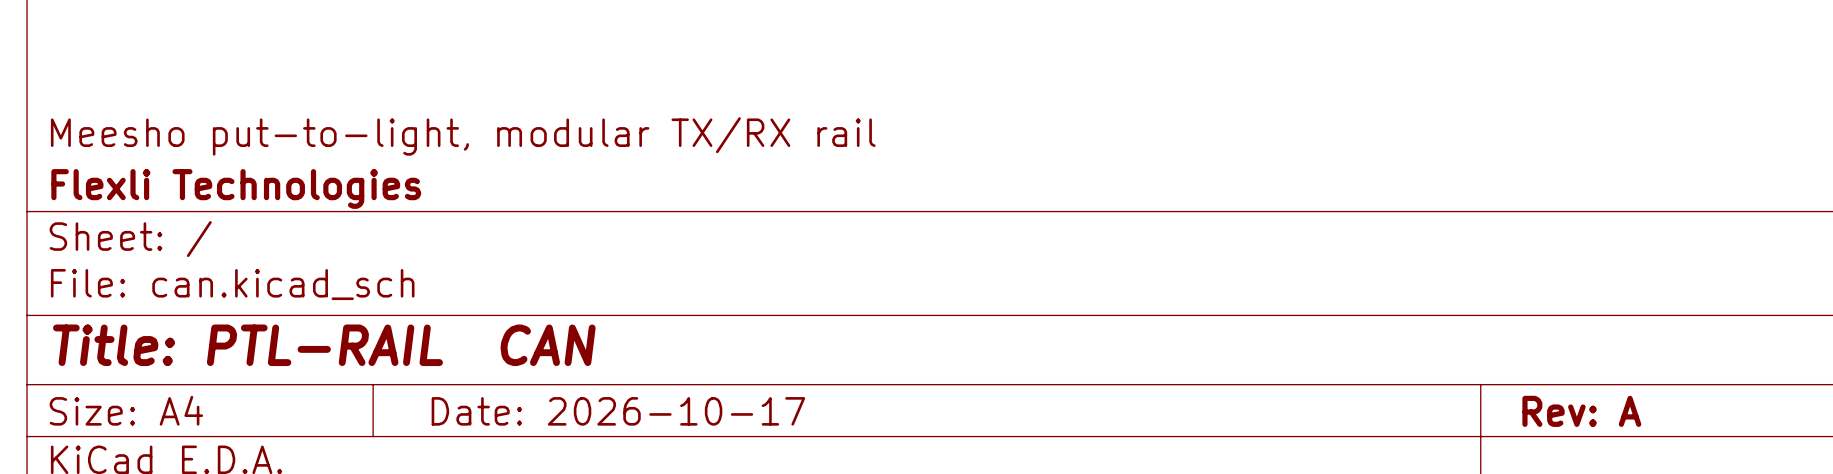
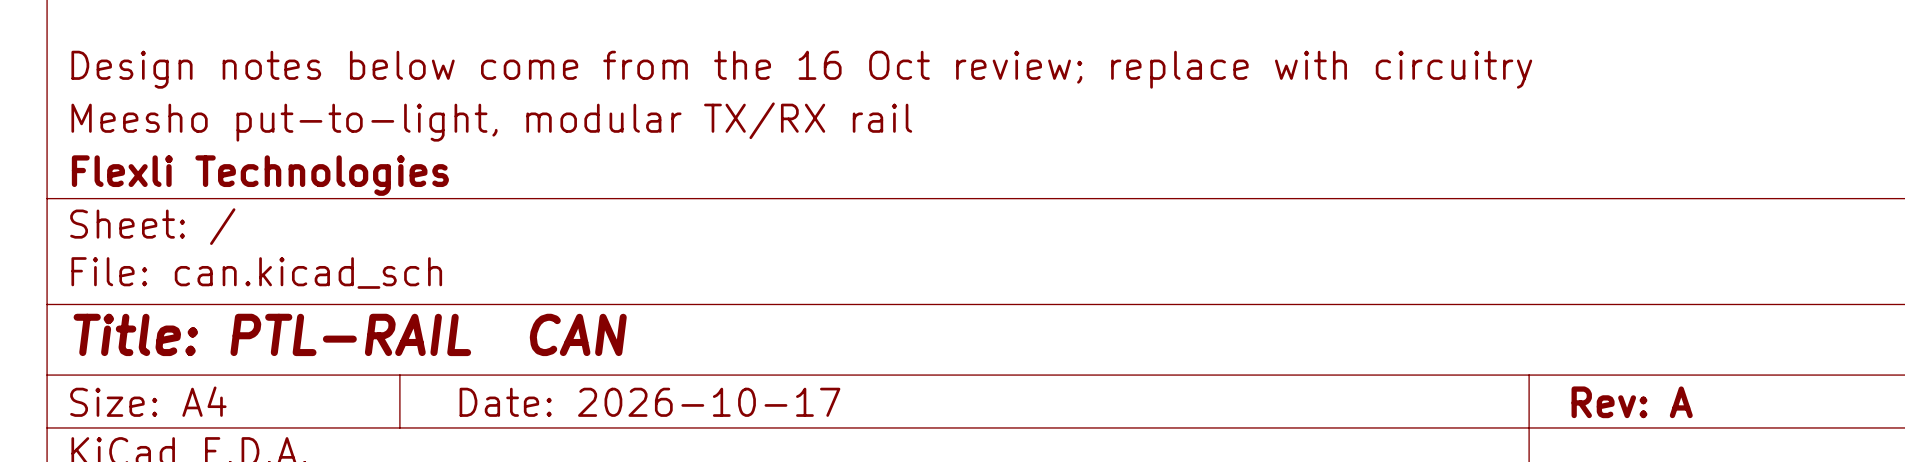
title block: none -> Design notes below come from the 16 Oct review; replace with circuitry (801, 69)

